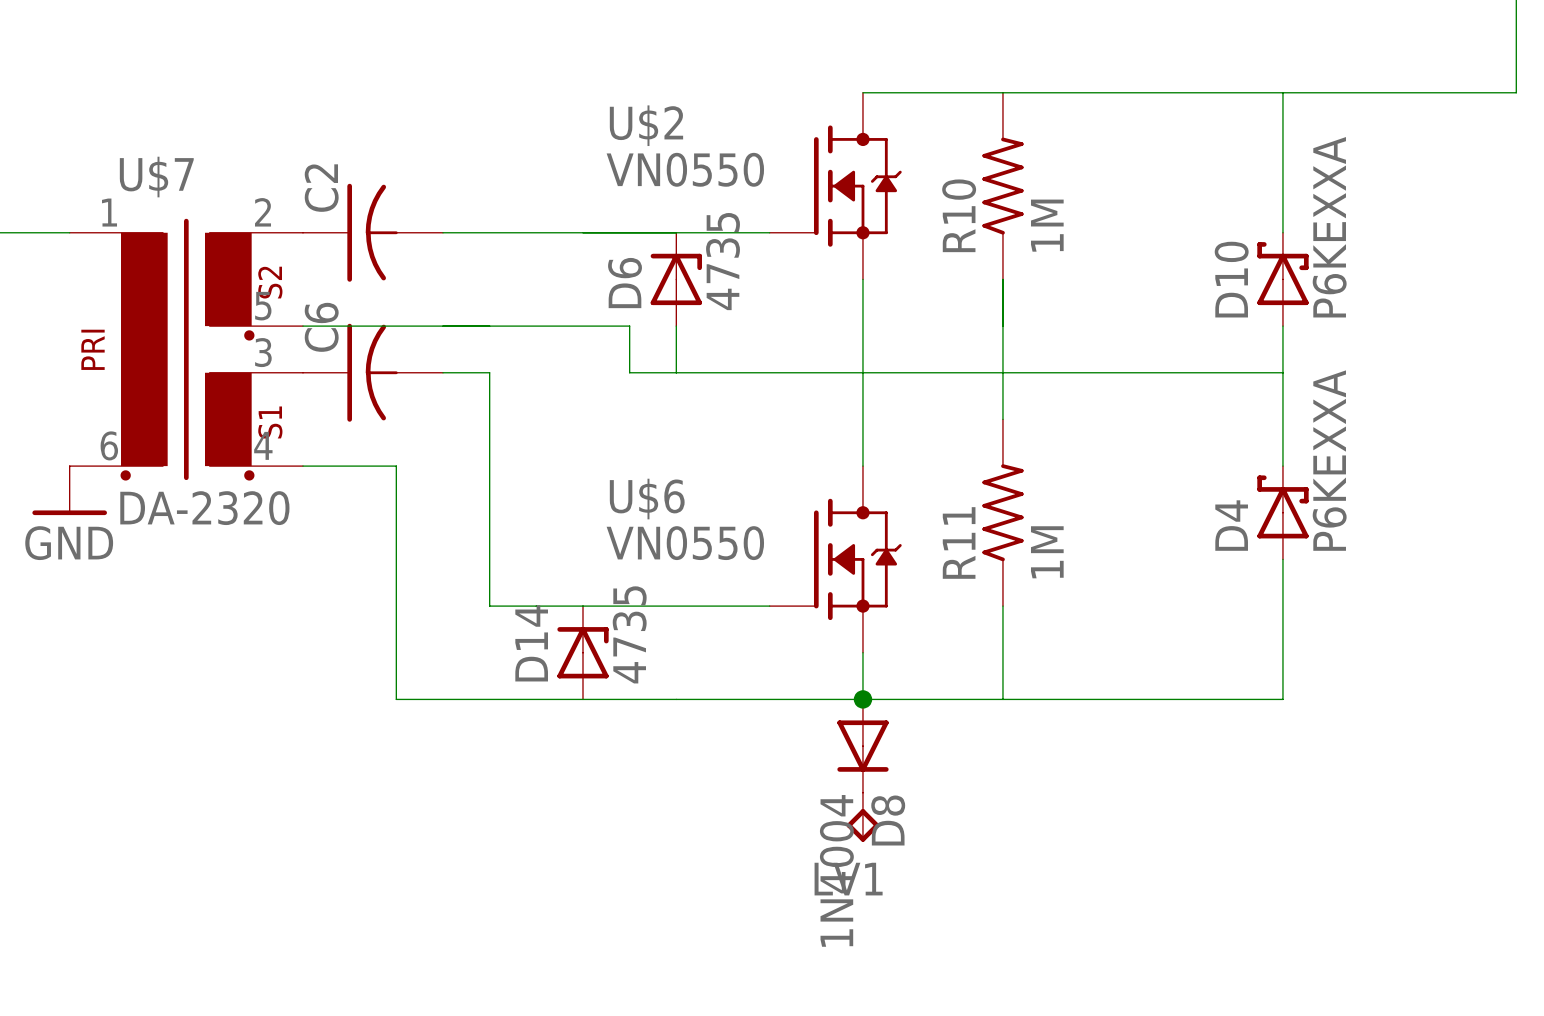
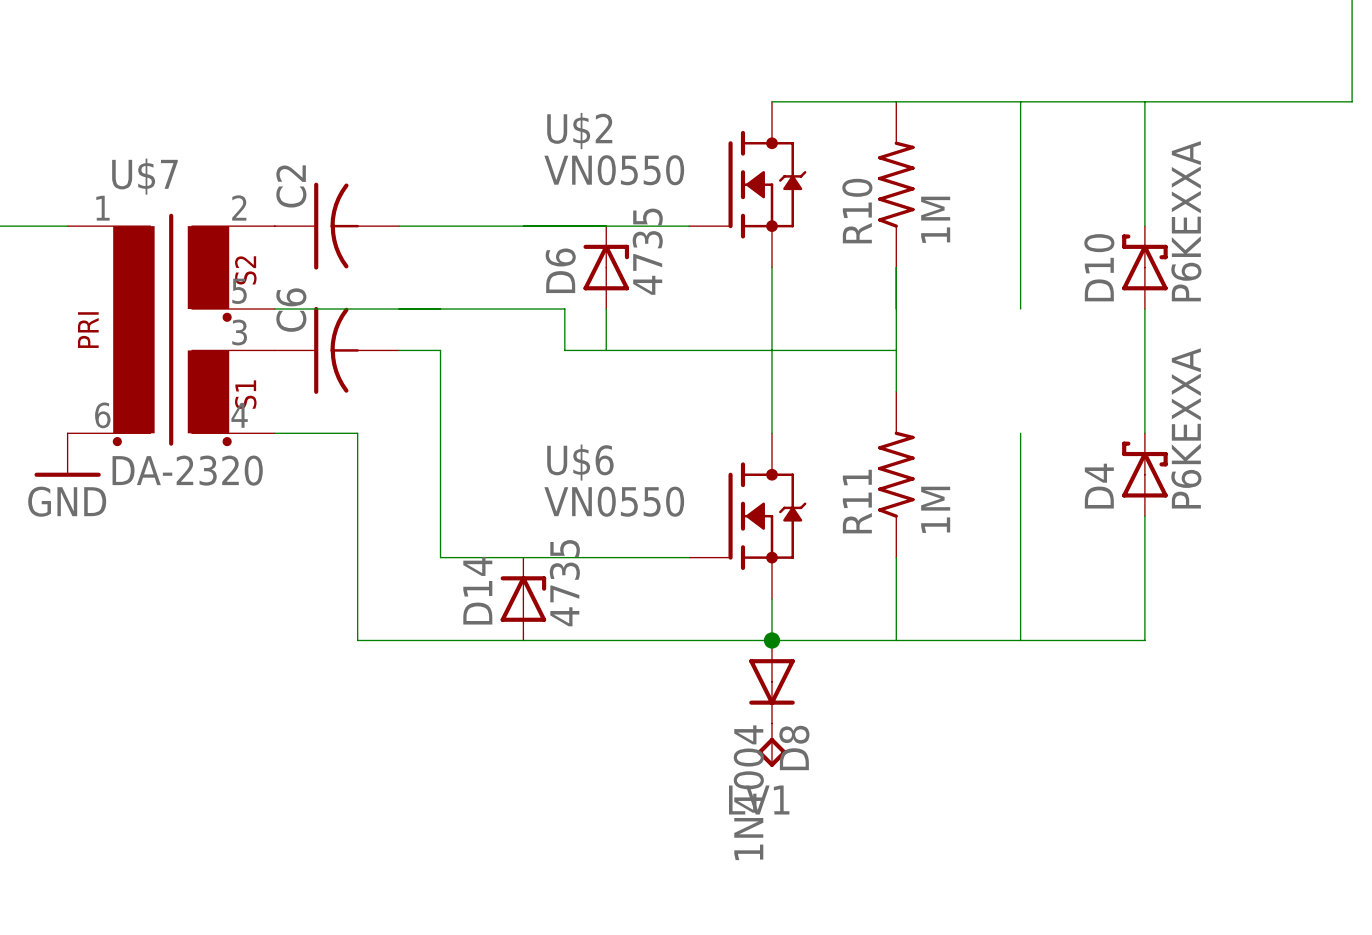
wire: none -> (1020, 101) (1020, 309)
wire: (1002, 372) (1282, 372) -> none
wire: none -> (1020, 433) (1020, 640)

